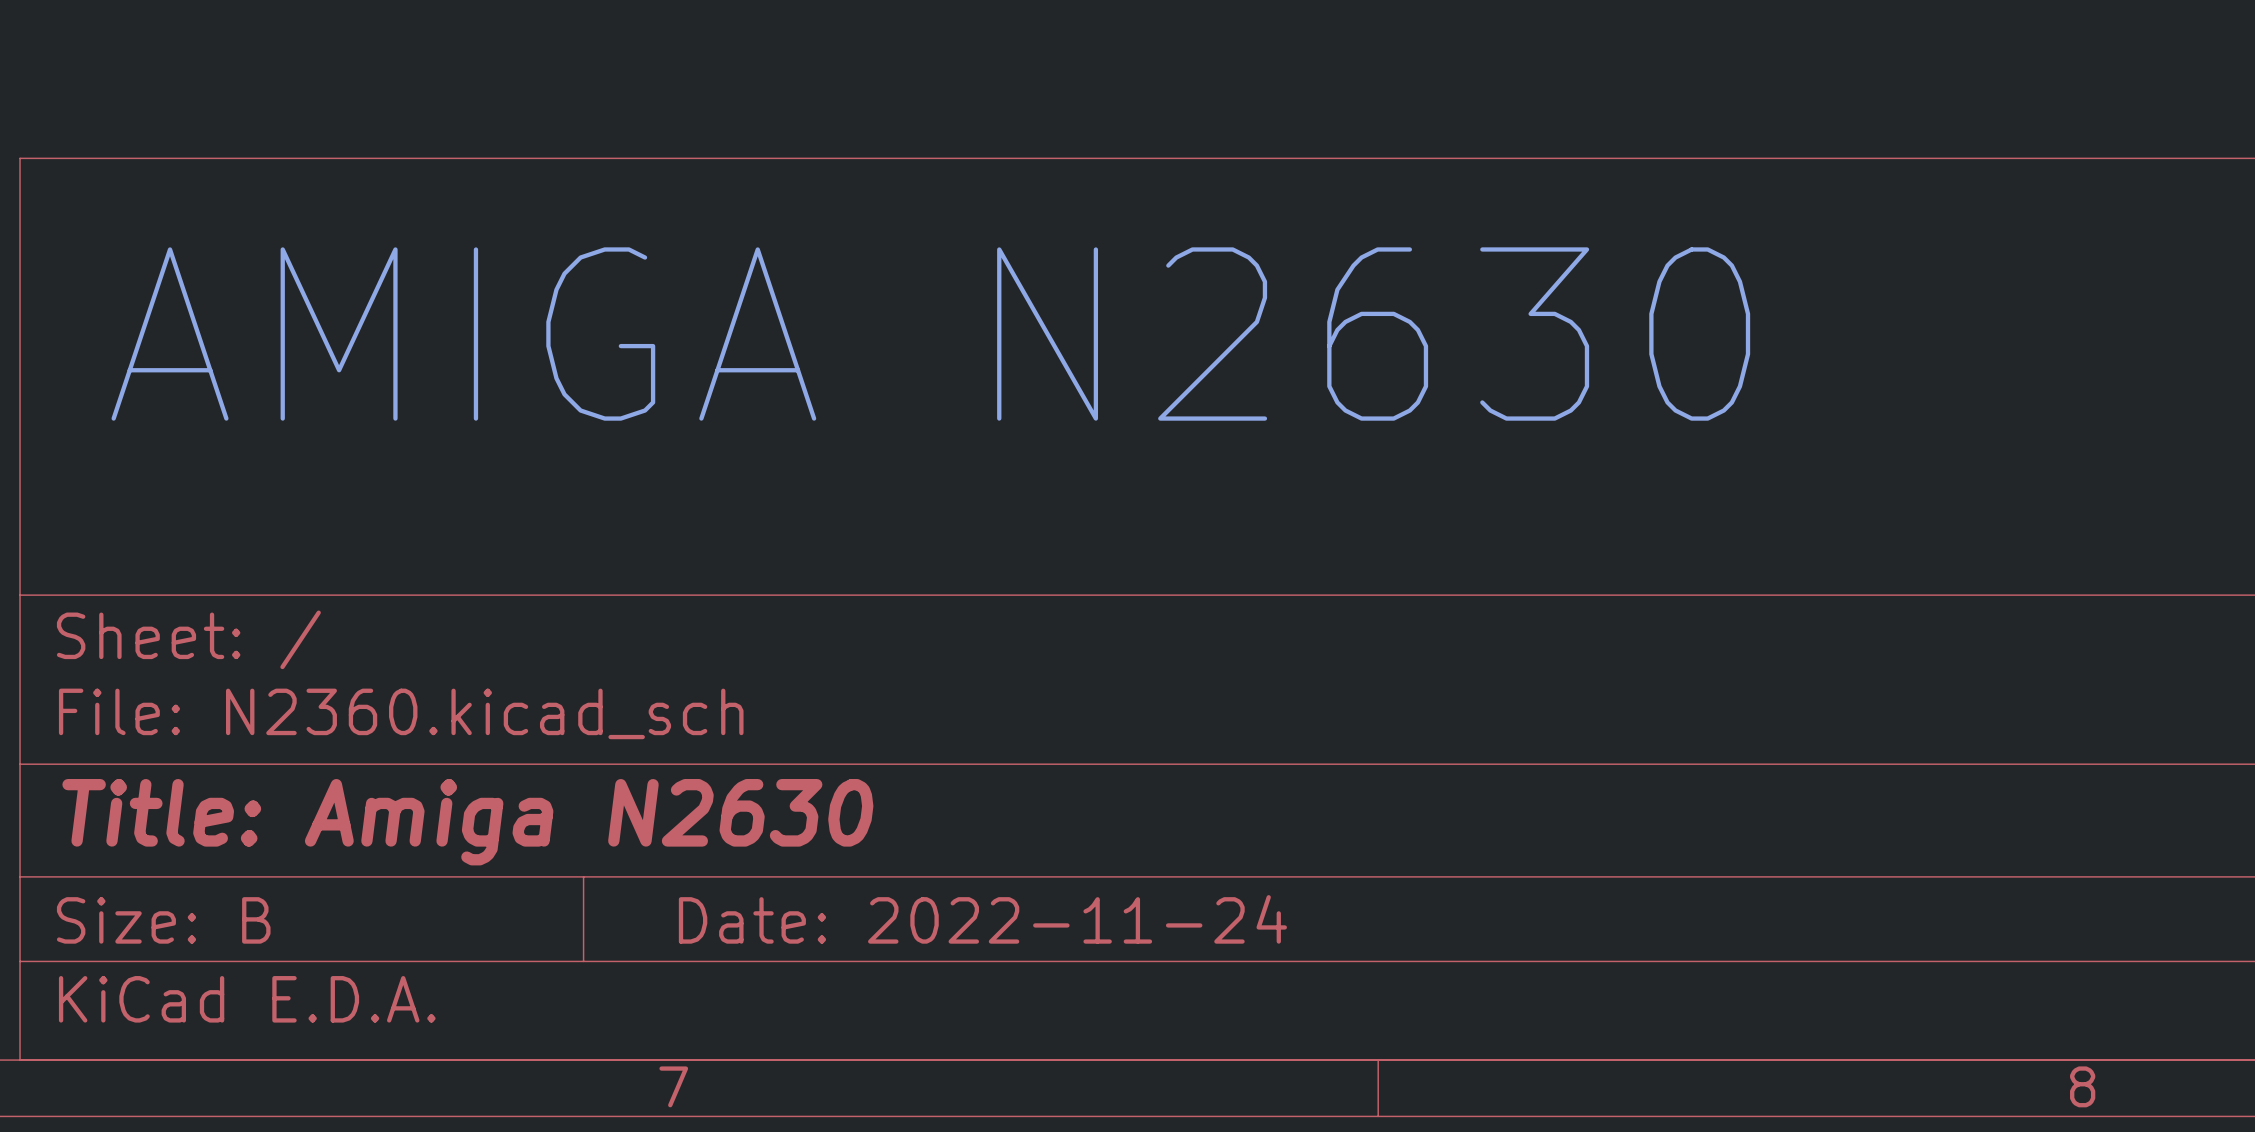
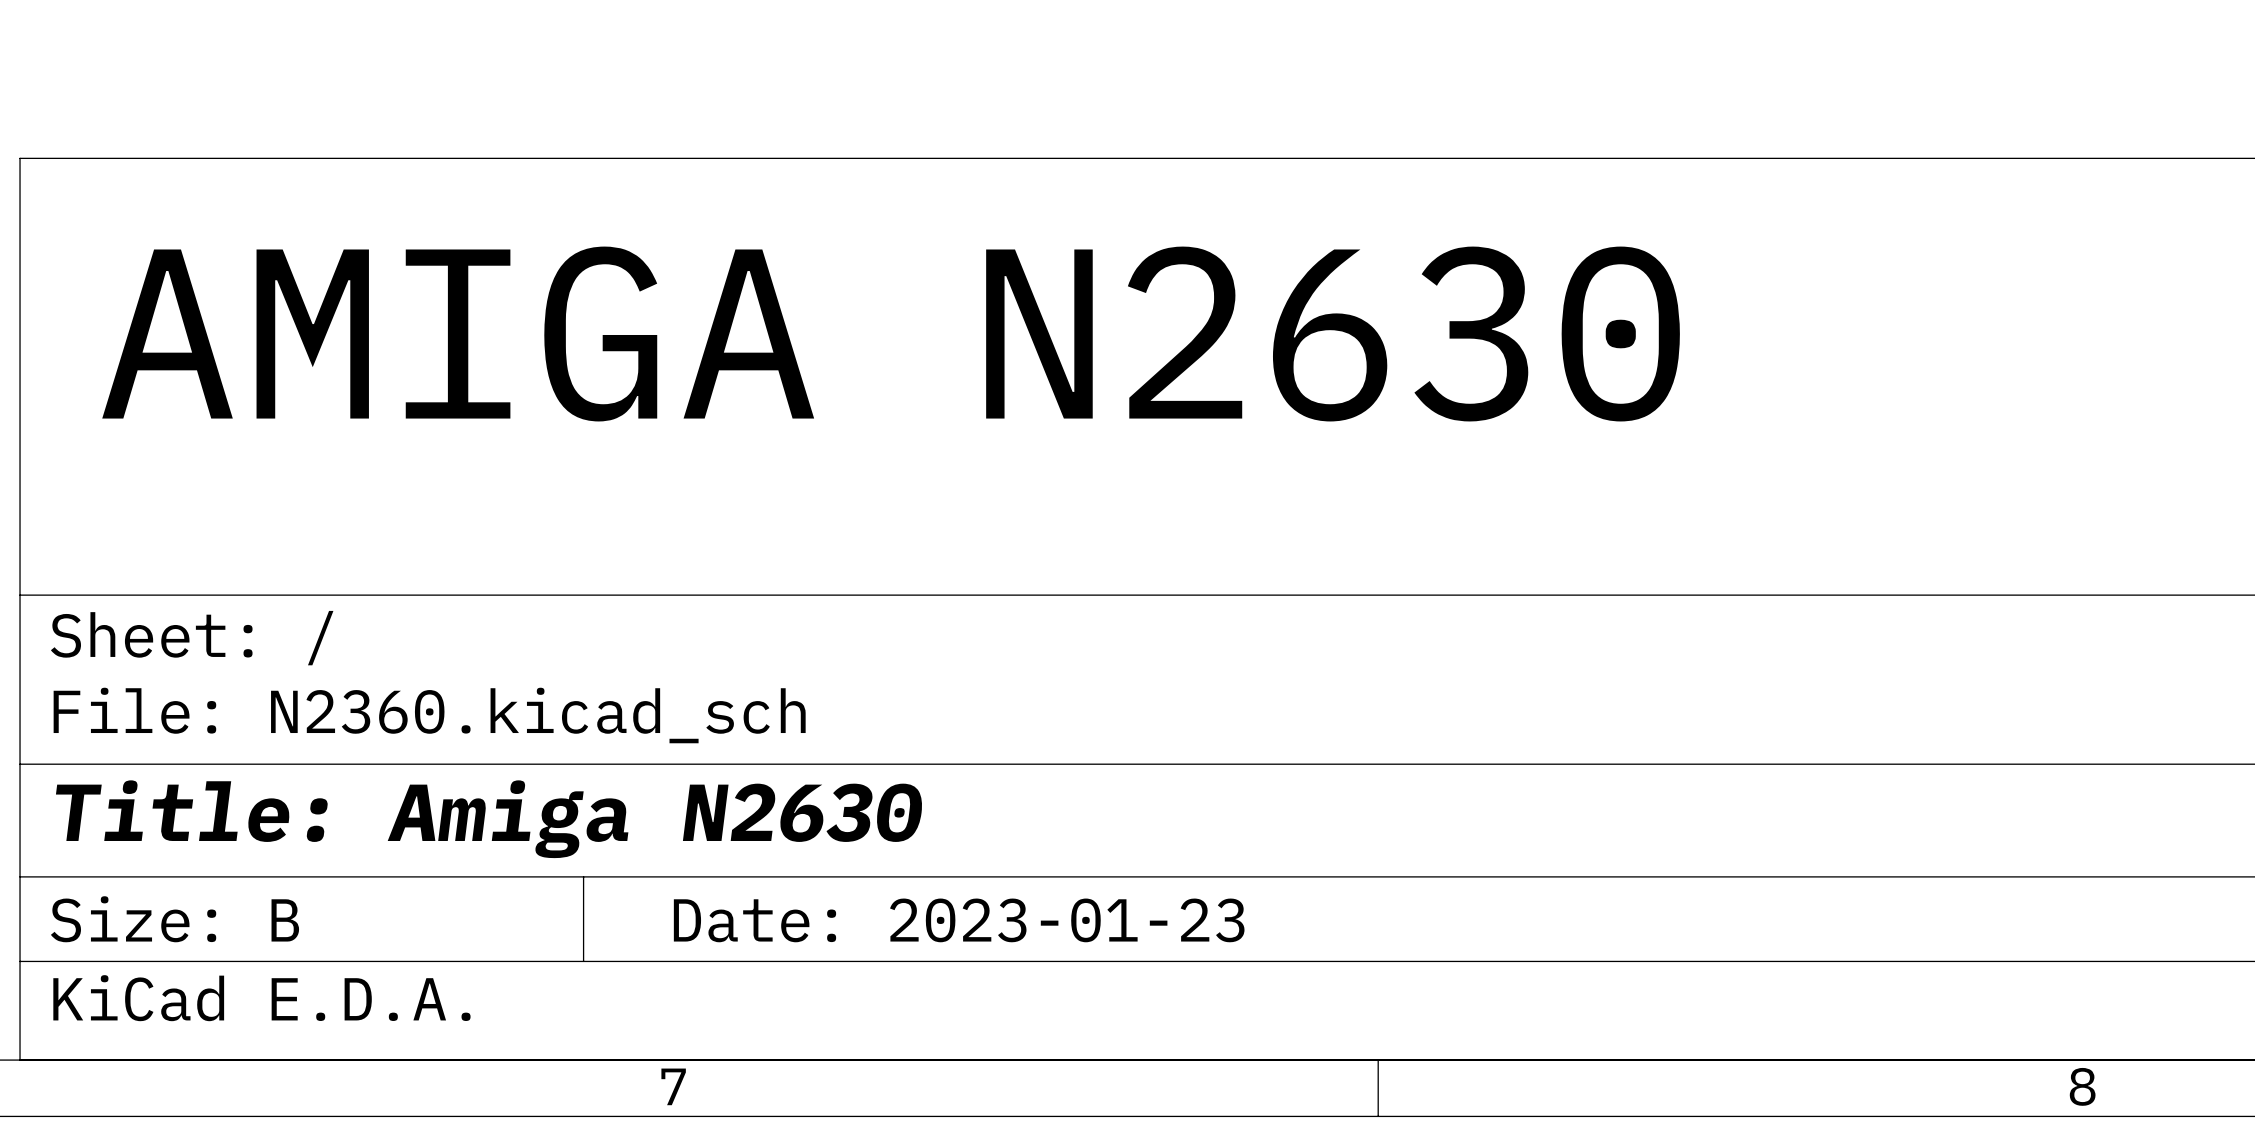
title block: Date: 2022-11-24 (982, 919) -> Date: 2023-01-23 (959, 920)

